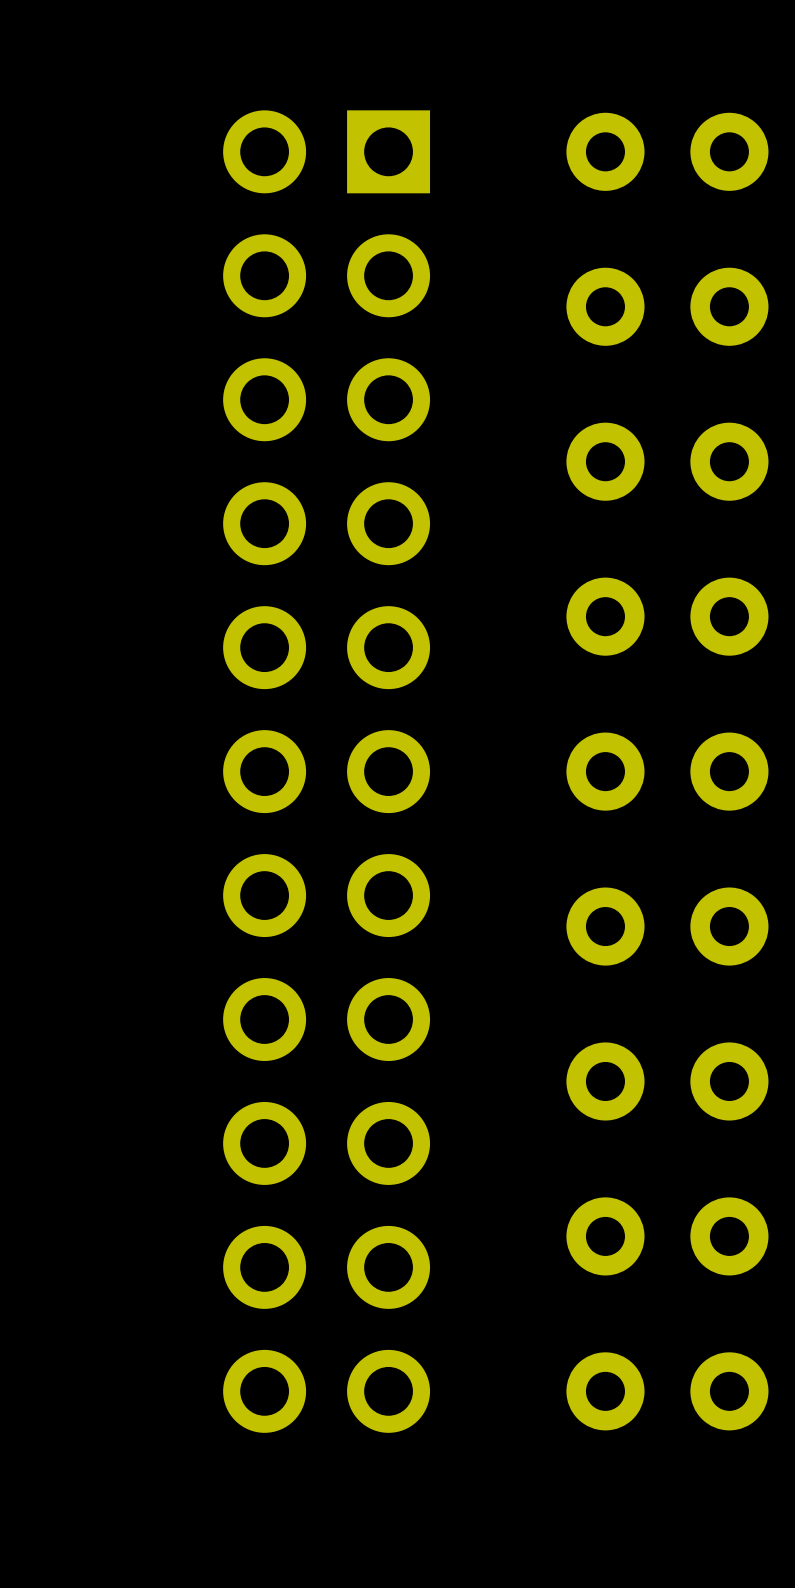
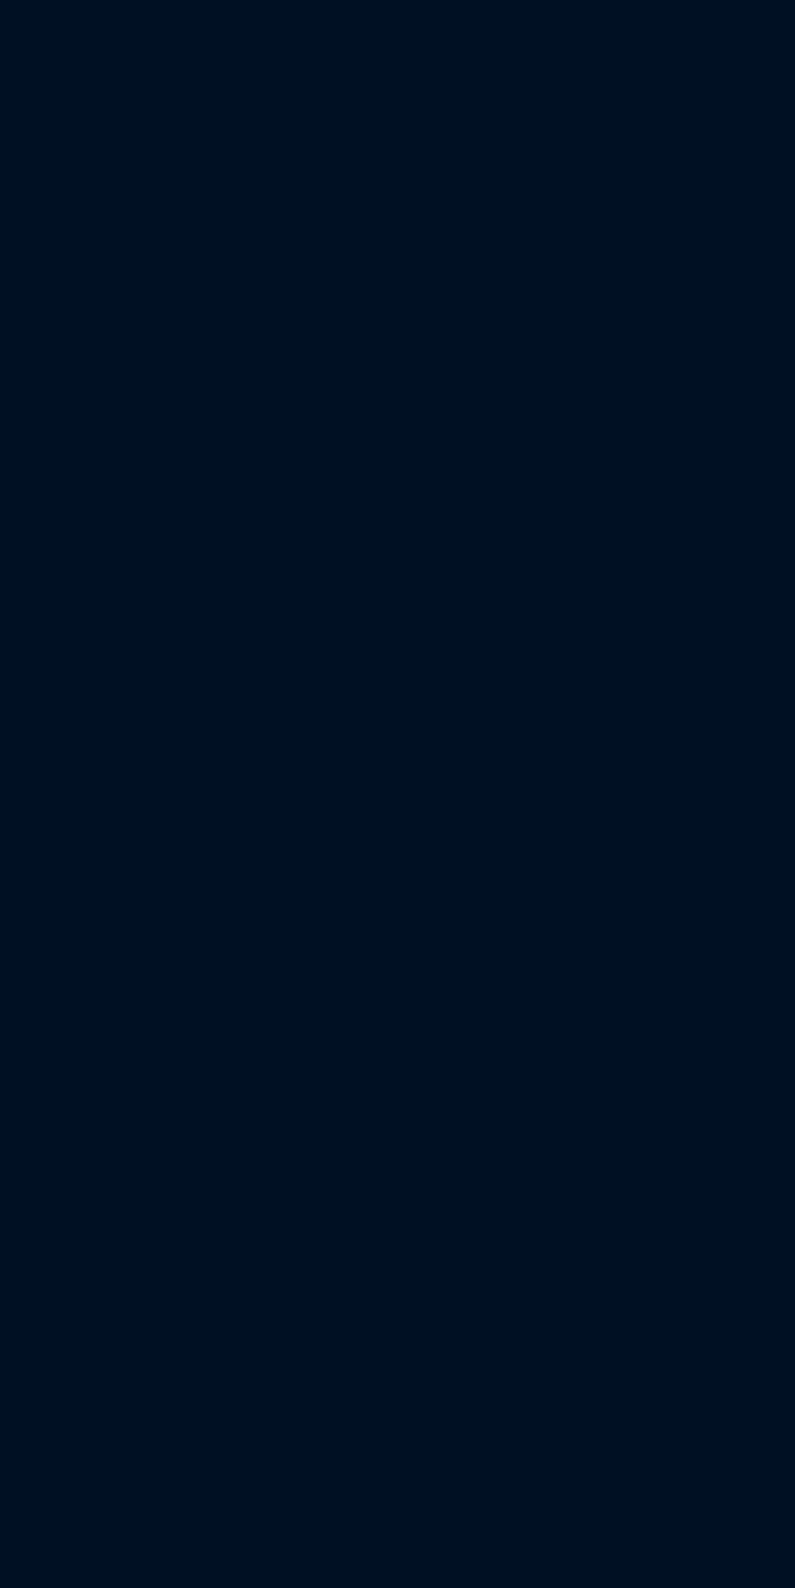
part: (667, 151) -> none
part: (667, 306) -> none
part: (667, 461) -> none
part: (667, 616) -> none
part: (326, 771) -> none
part: (667, 771) -> none
part: (667, 926) -> none
part: (667, 1081) -> none
part: (667, 1236) -> none
part: (667, 1391) -> none

